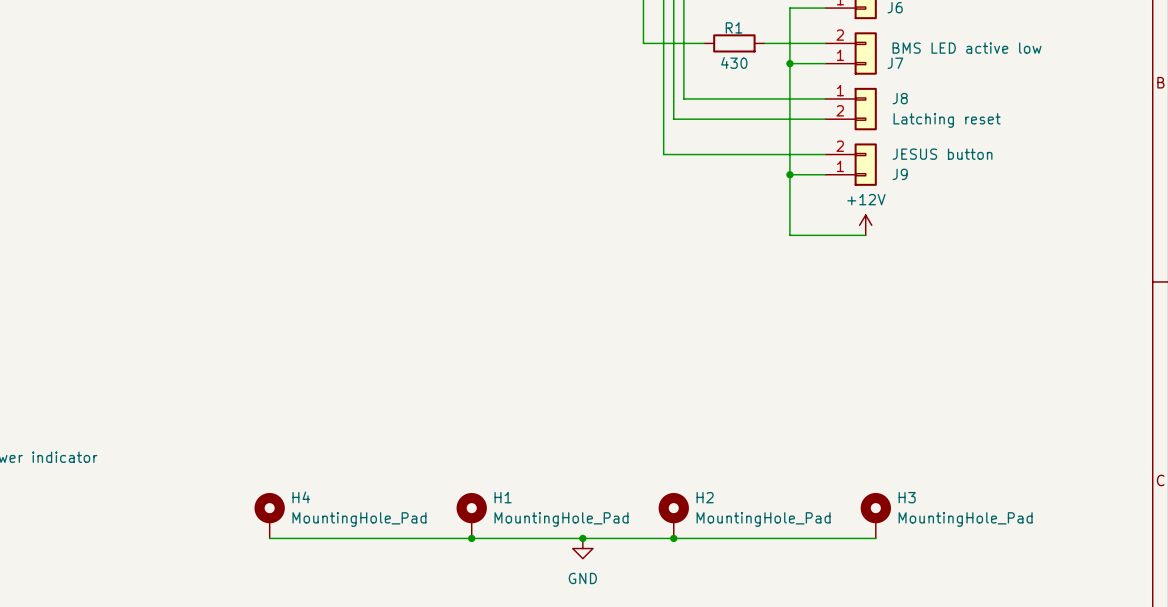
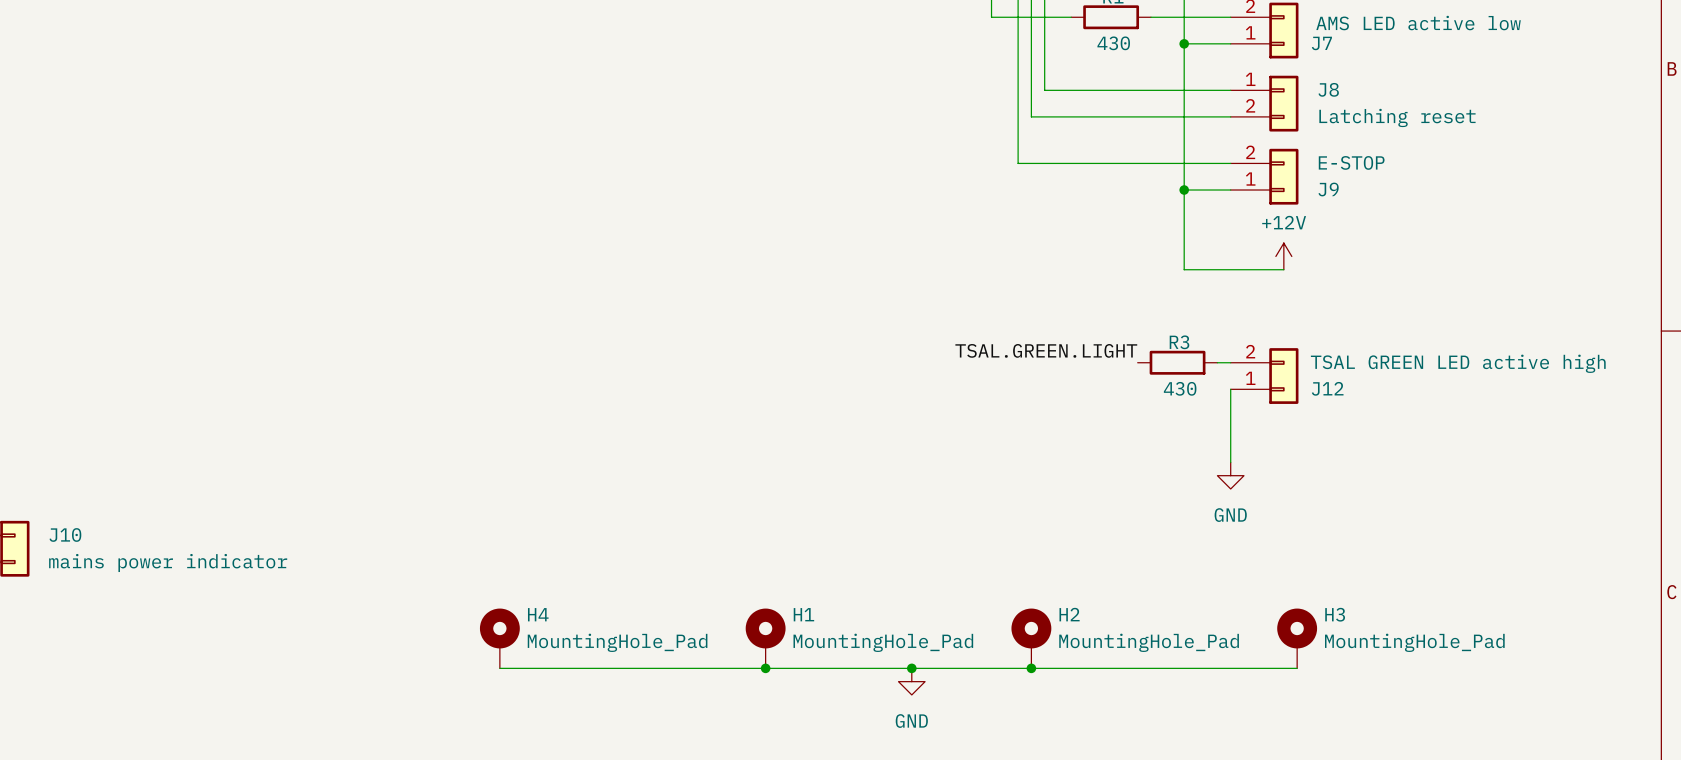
J7 value: BMS LED active low (967, 48) -> AMS LED active low (1418, 23)
J9 value: JESUS button (942, 154) -> E-STOP (1351, 162)
label: none -> TSAL.GREEN.LIGHT (1046, 350)
R3: none -> 430 (1177, 362)
wire: none -> (1217, 362) (1230, 362)
J12: none -> TSAL GREEN LED active high (1264, 376)
wire: none -> (1230, 389) (1230, 462)
power symbol: none -> GND (1230, 475)

